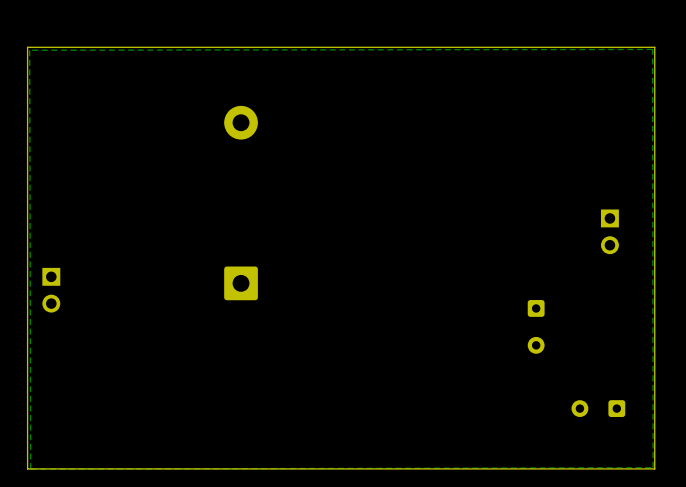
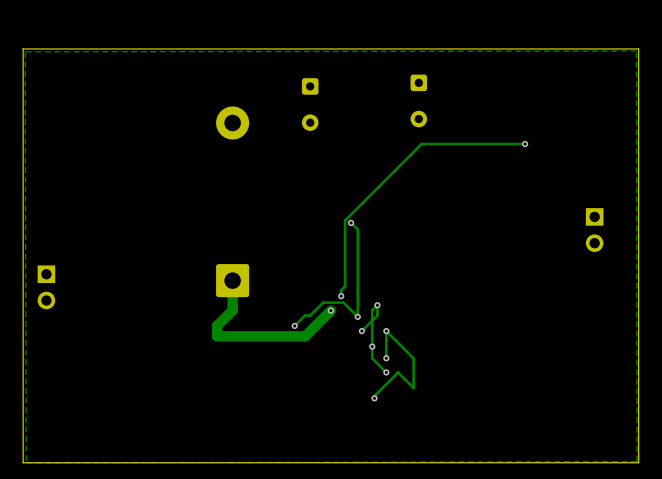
part: none -> (418, 100)
part: none -> (310, 104)
track: none -> (525, 144) (421, 144) (345, 220) (345, 286) (341, 290) (341, 296)
via: none -> (525, 144)
track: none -> (351, 222) (357, 229) (357, 316) (343, 302) (323, 302) (310, 315) (305, 315) (294, 325)
via: none -> (351, 222)
track: none -> (232, 280) (232, 310) (217, 325) (217, 336) (305, 336) (330, 310)
via: none -> (341, 296)
via: none -> (377, 305)
via: none -> (330, 310)
via: none -> (357, 316)
part: (536, 326) -> none
via: none -> (294, 325)
track: none -> (361, 331) (377, 315) (377, 305) (372, 310) (372, 358) (386, 372)
via: none -> (361, 331)
via: none -> (386, 331)
via: none -> (372, 346)
track: none -> (386, 358) (386, 331) (413, 358) (413, 387) (398, 372) (374, 398)
via: none -> (386, 358)
via: none -> (386, 372)
via: none -> (374, 398)
part: (598, 408) -> none

